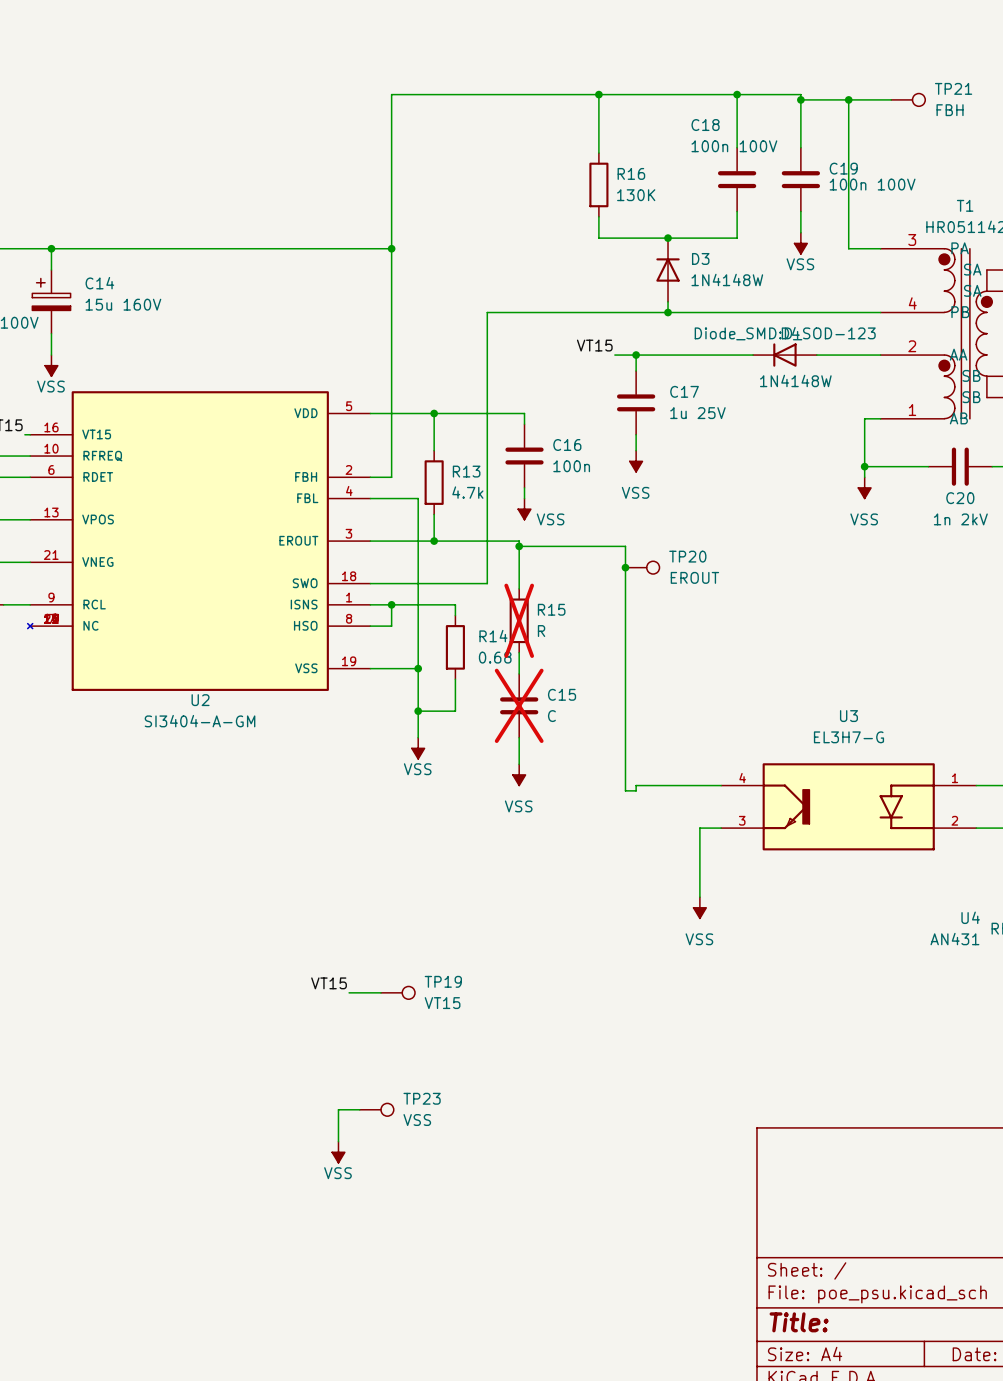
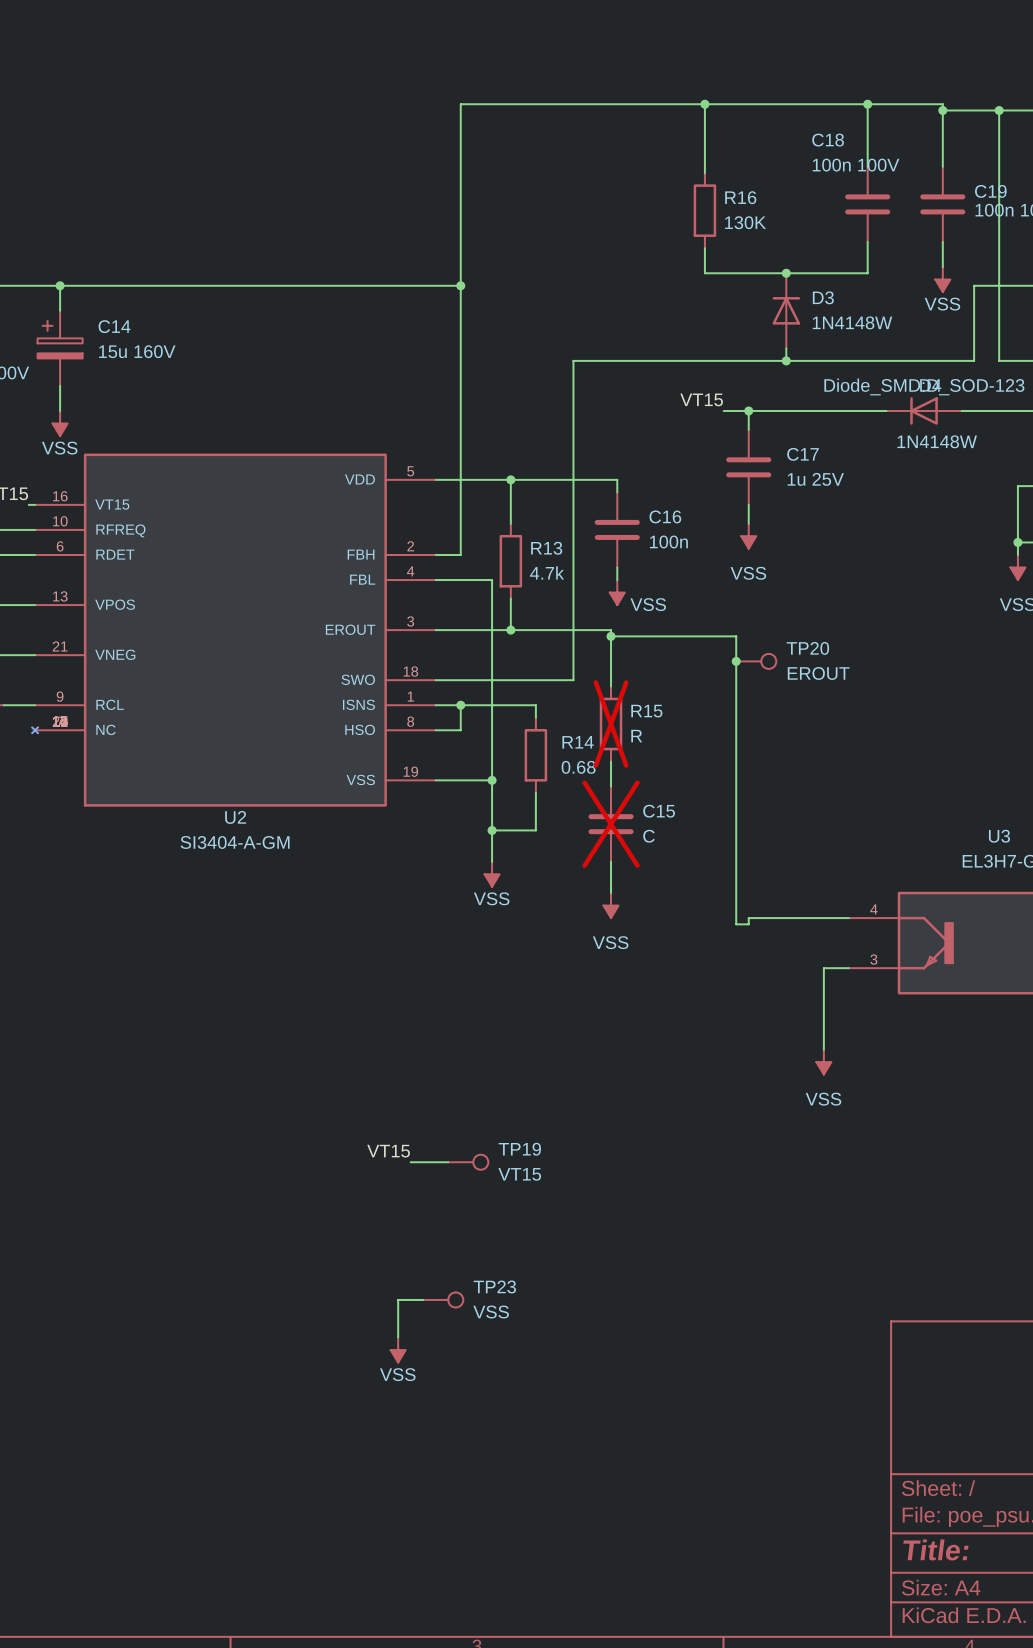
wire: (827, 312) (848, 312) -> (974, 360) (974, 285) (999, 285) (999, 360)

